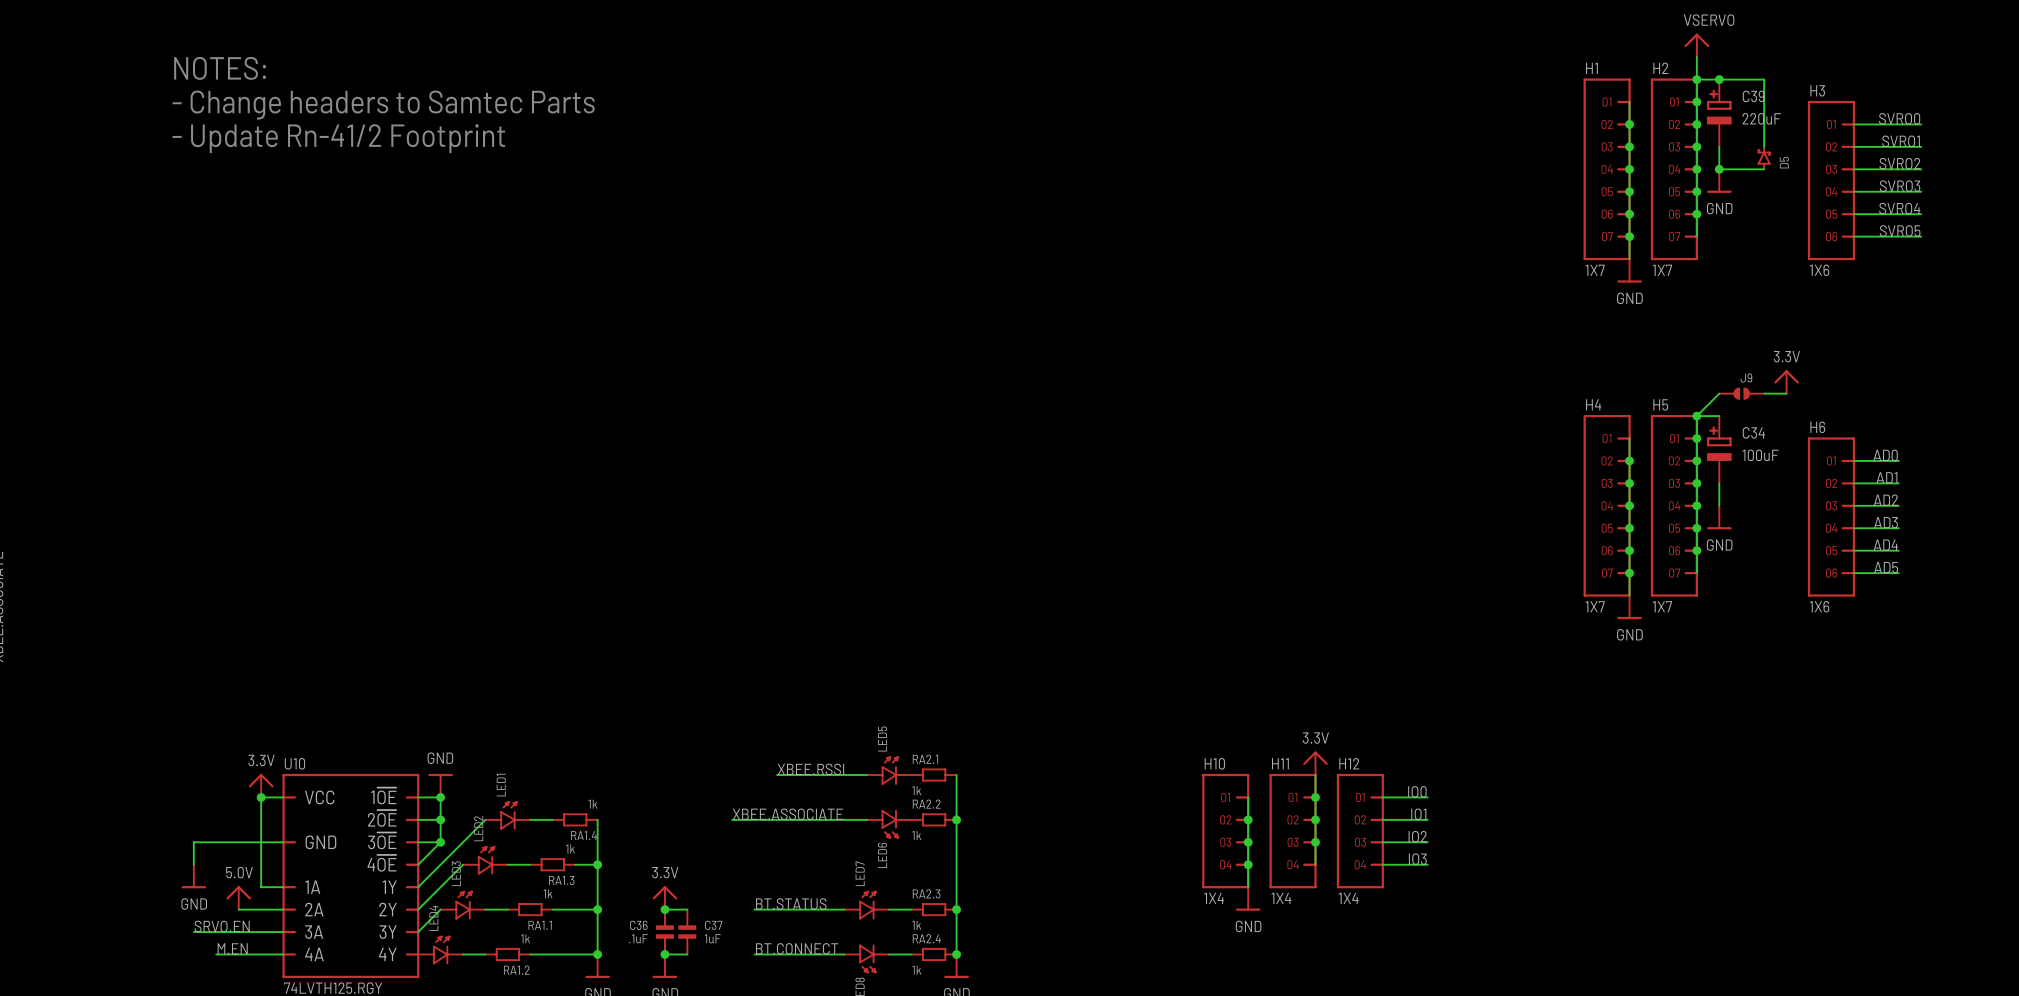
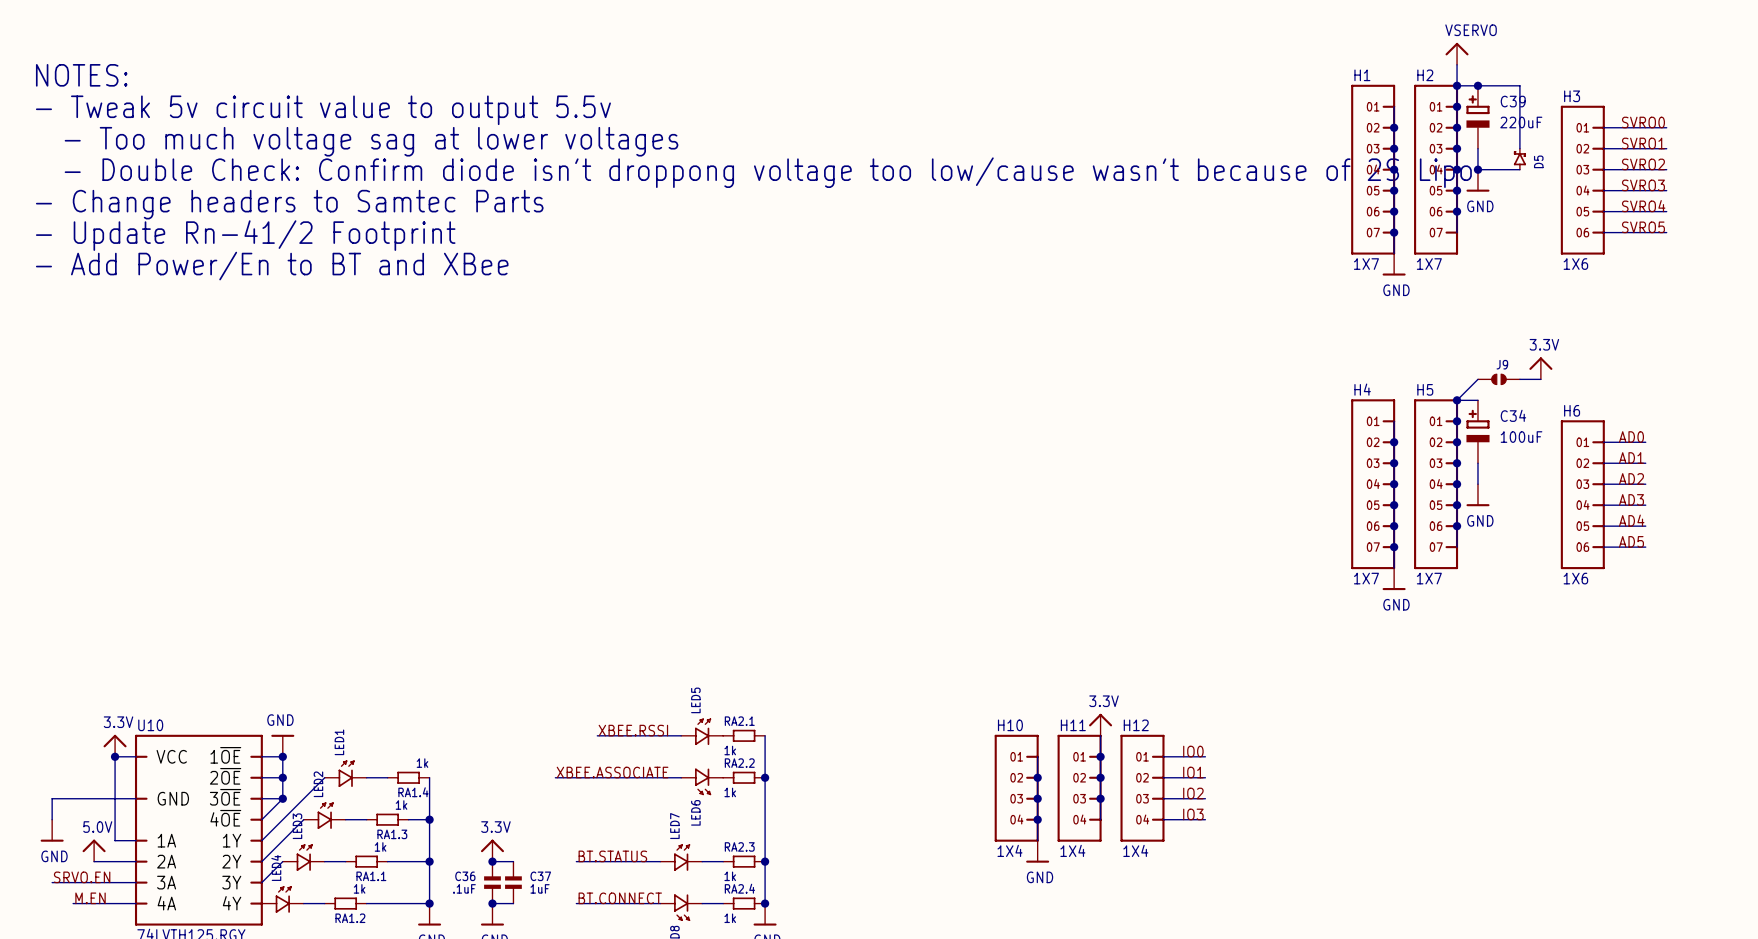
text: - Change headers to Samtec Parts (383, 105) -> - Tweak 5v circuit value to output 5.5v (323, 110)
text: - Update Rn-41/2 Footprint (338, 138) -> - Too much voltage sag at lower voltages (371, 141)
text: none -> - Double Check: Confirm diode isn't droppong voltage too low/cause wasn't because of 2S Lipo (768, 172)
text: none -> - Change headers to Samtec Parts (289, 204)
text: none -> - Update Rn-41/2 Footprint (245, 235)
text: none -> - Add Power/En to BT and XBee (272, 266)

